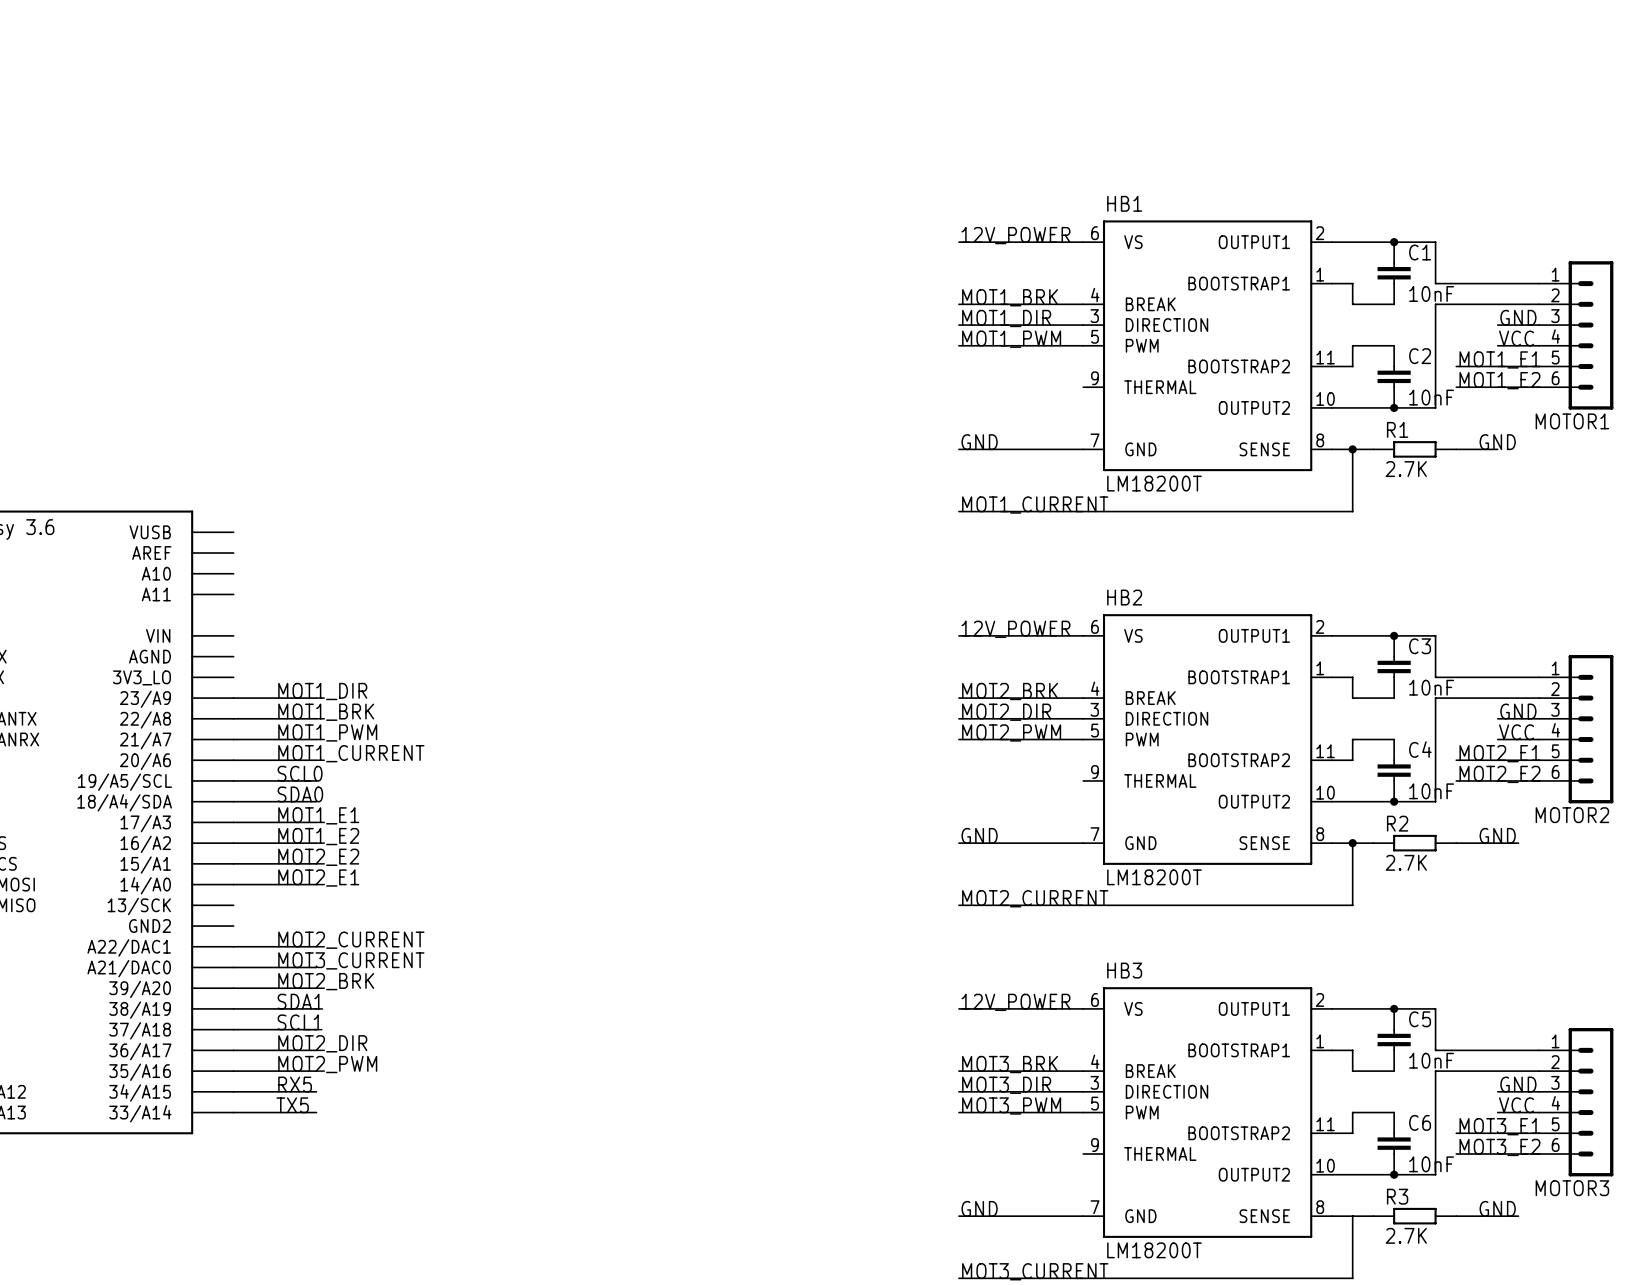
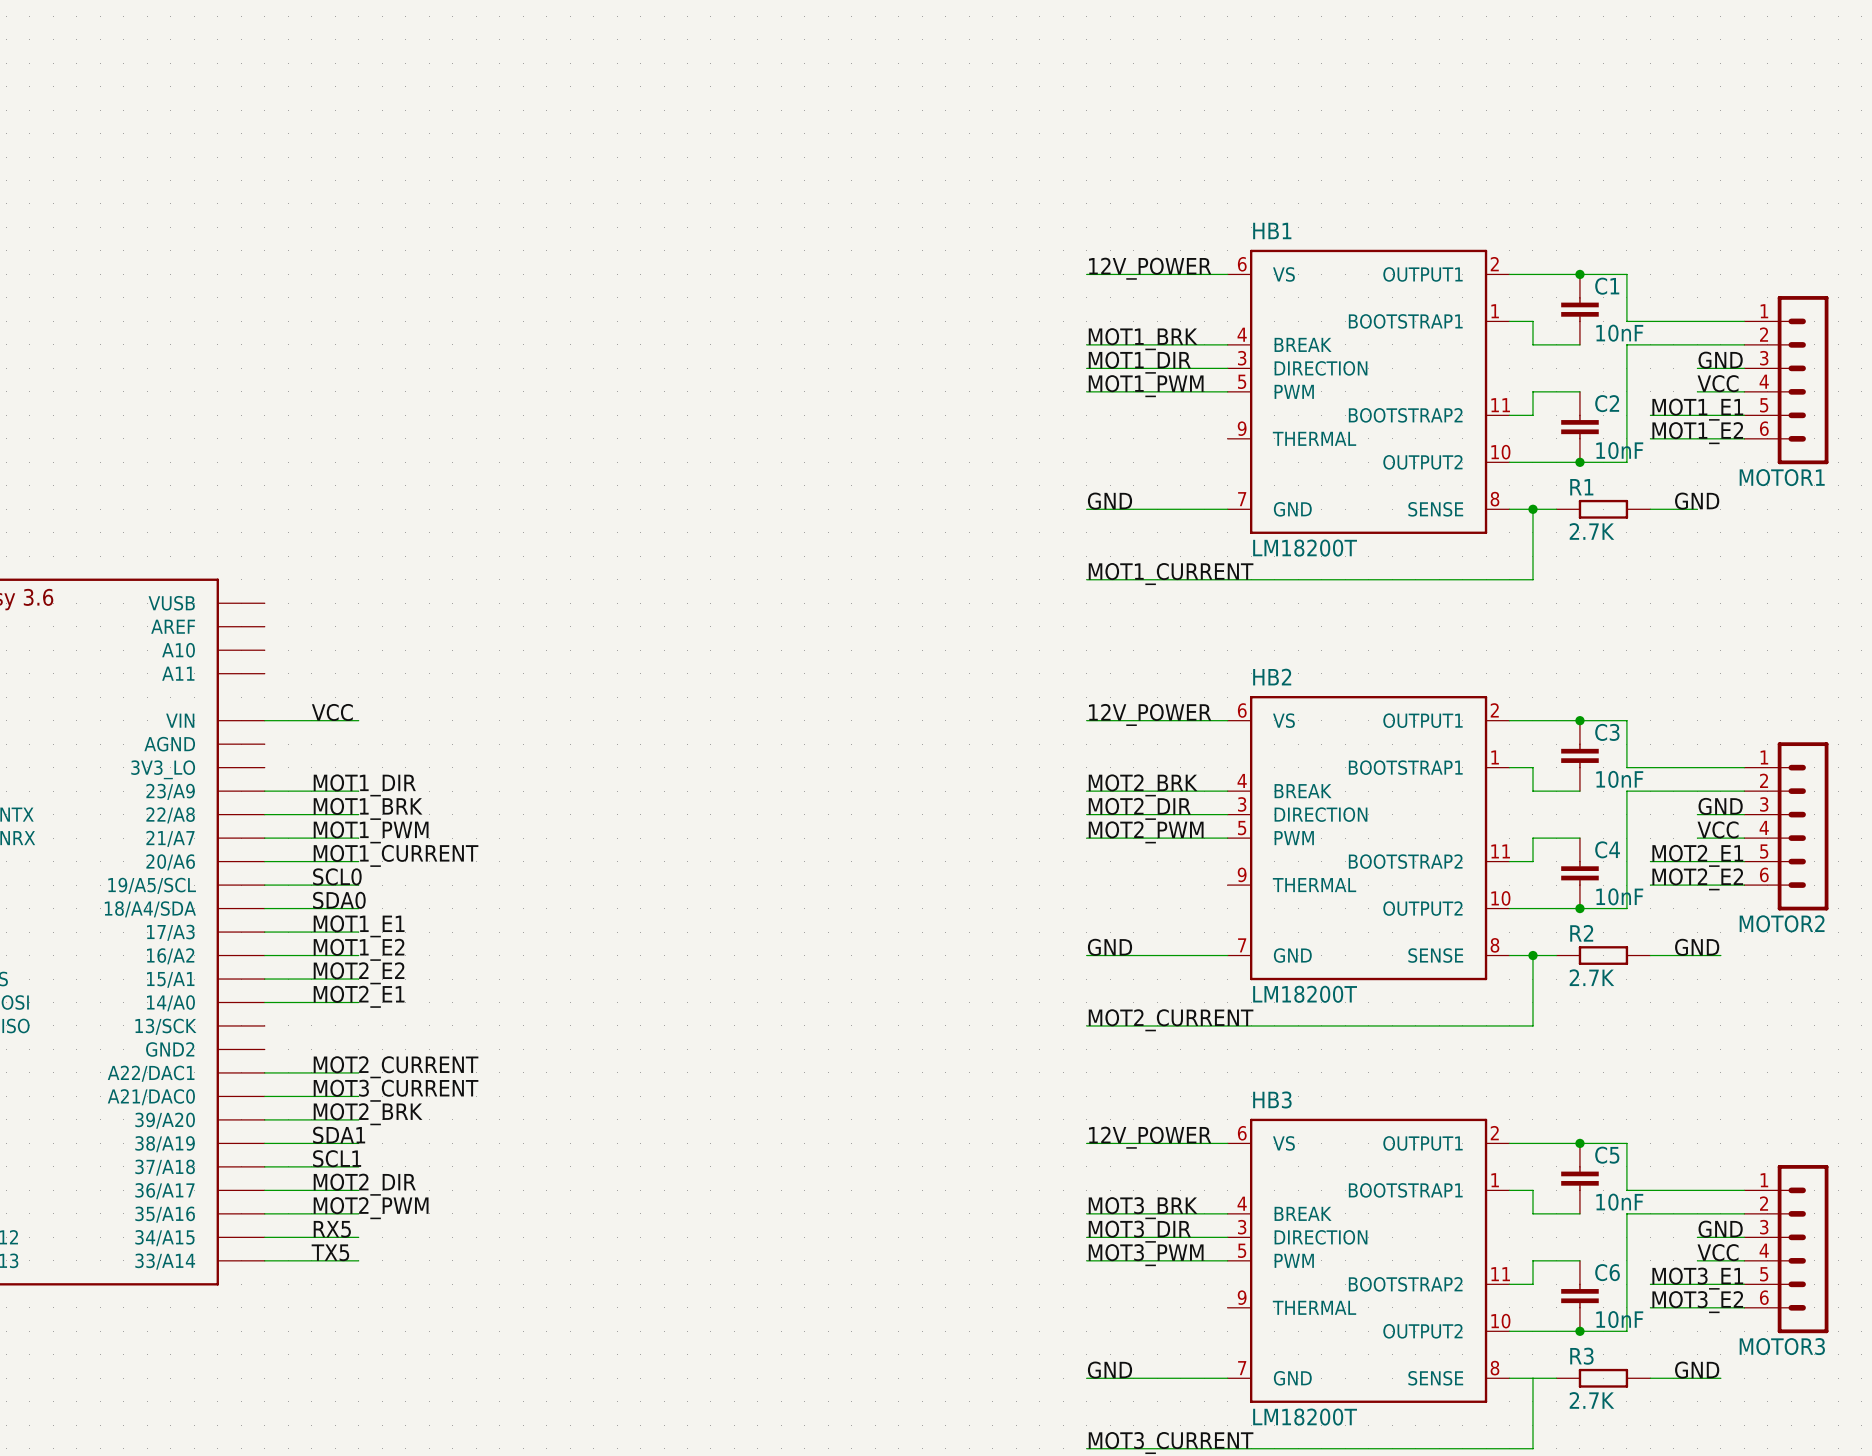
label: none -> VCC (332, 712)
wire: none -> (264, 720) (358, 720)

